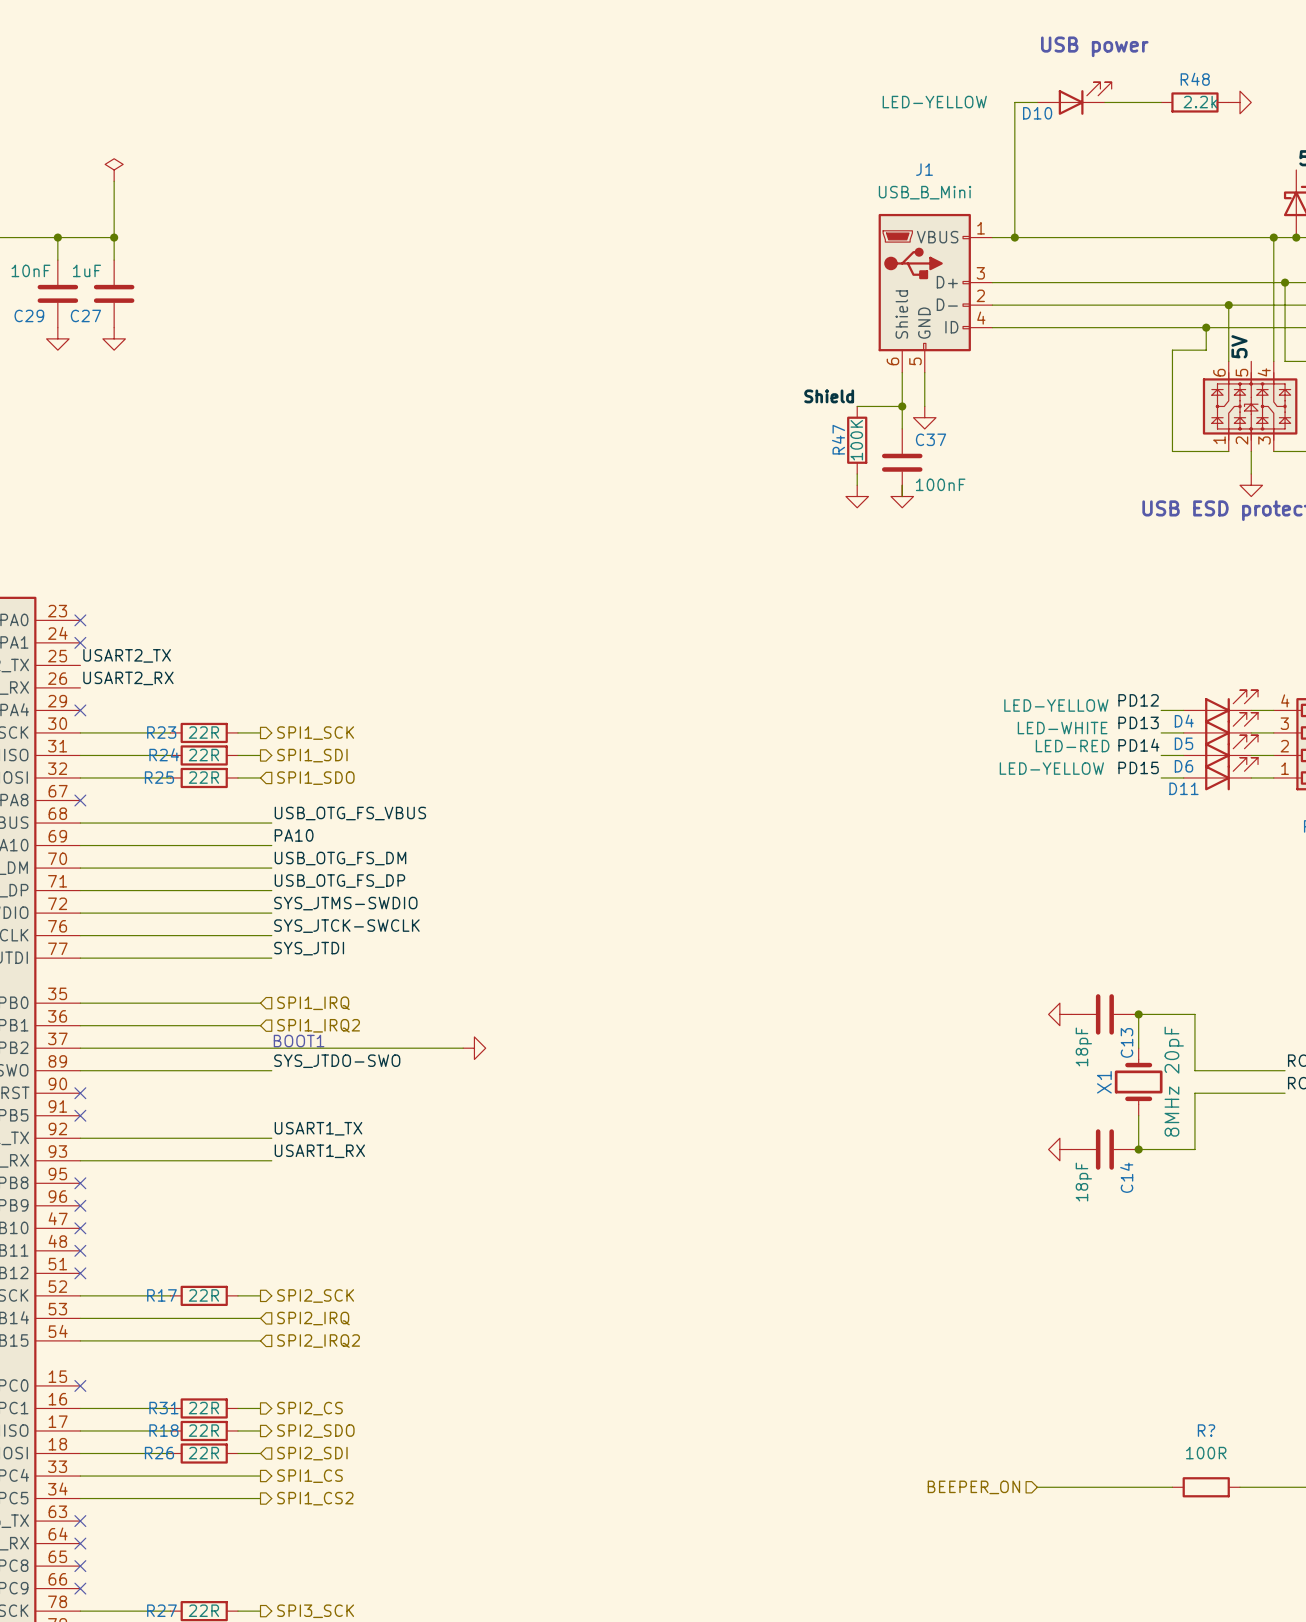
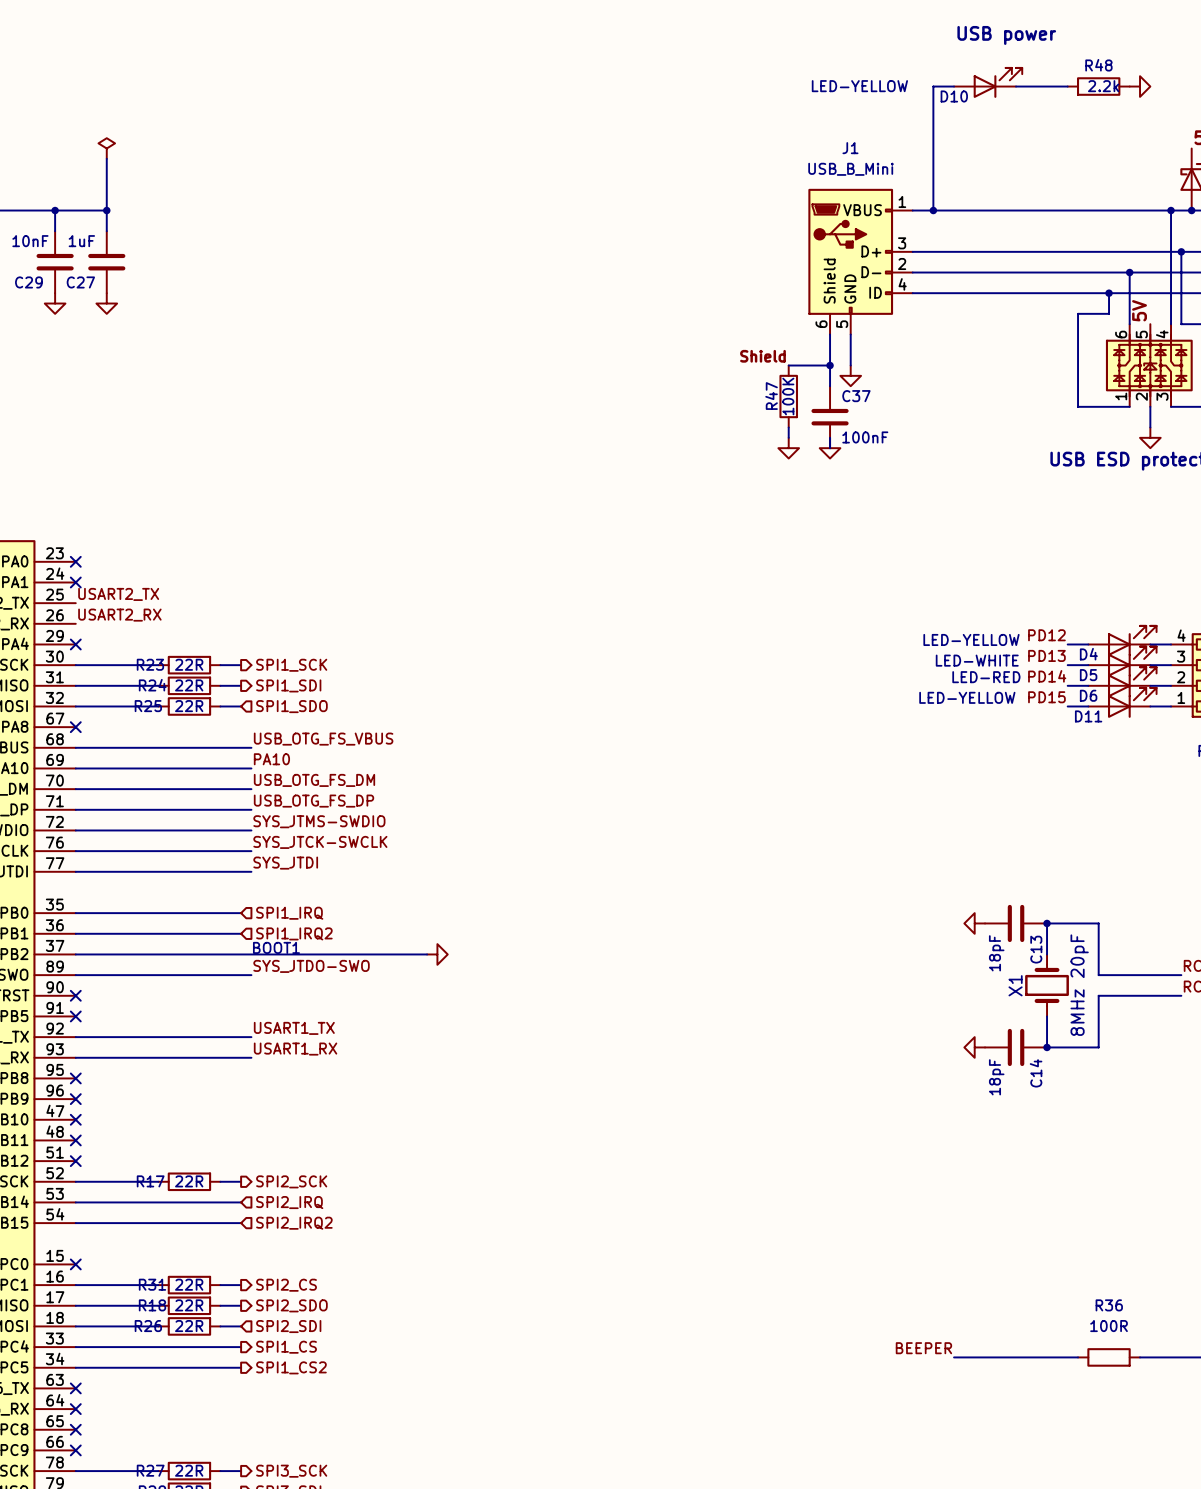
R? name: R? (1206, 1430) -> R36 (1109, 1305)
label: none -> BEEPER (923, 1348)
hierarchical label: BEEPER_ON (973, 1487) -> none

